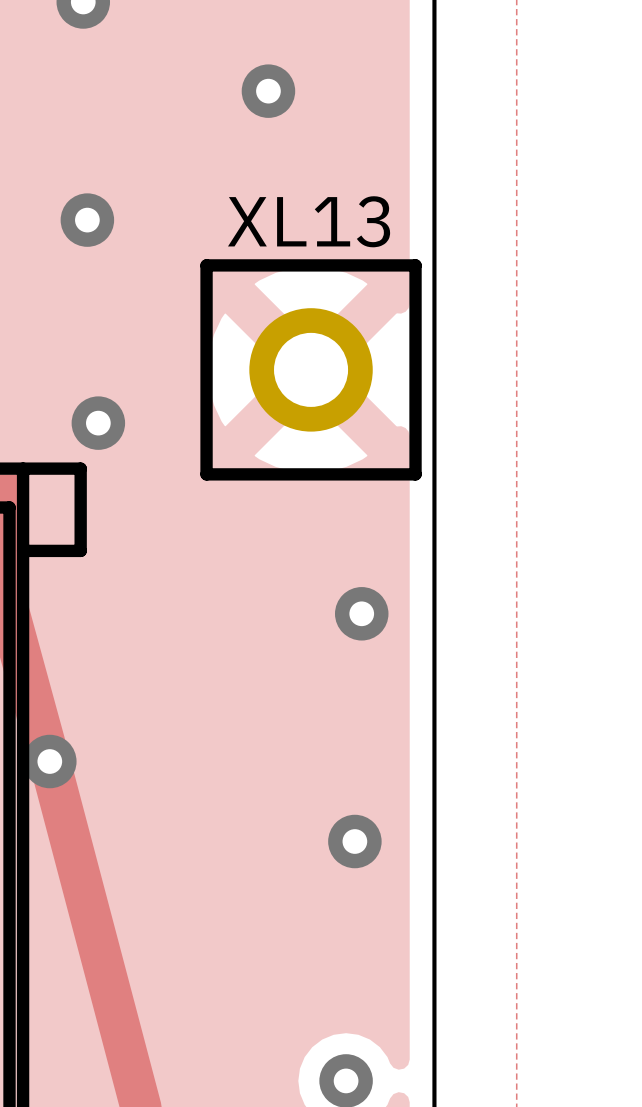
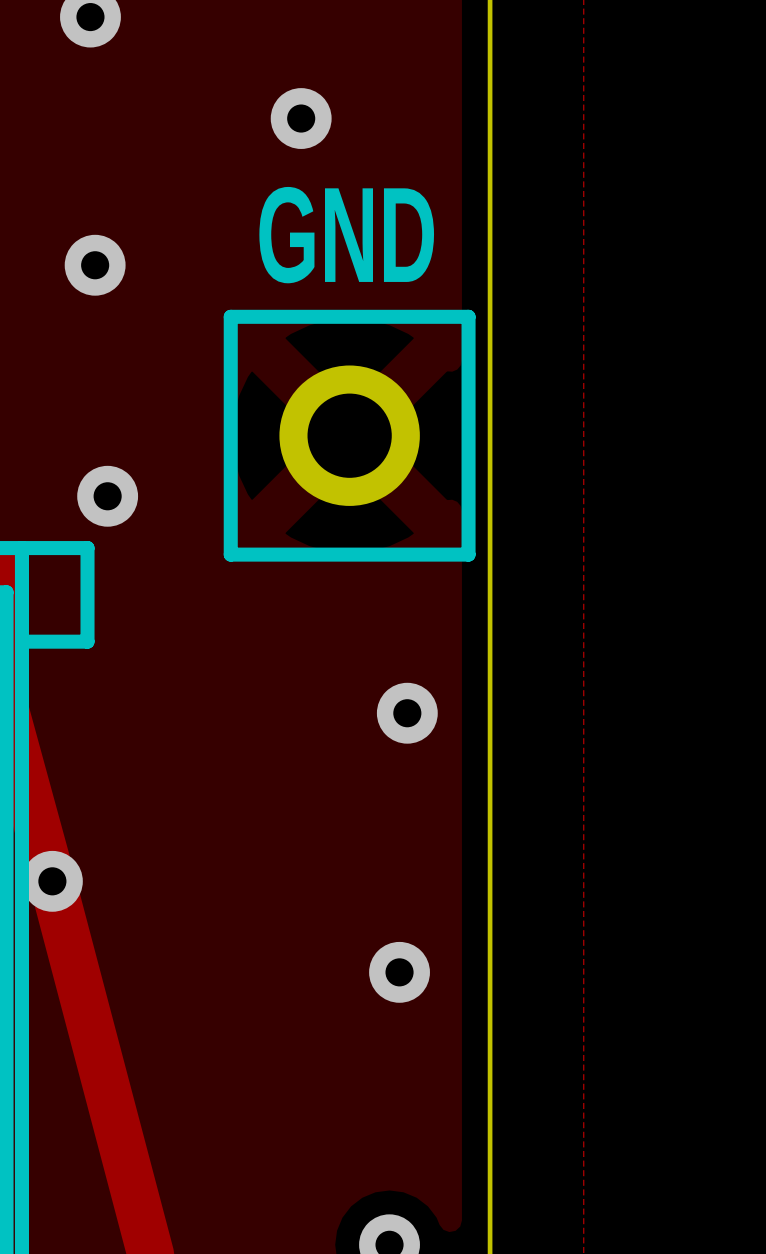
text: none -> GND (346, 235)
XL13 name: XL13 (309, 221) -> none

